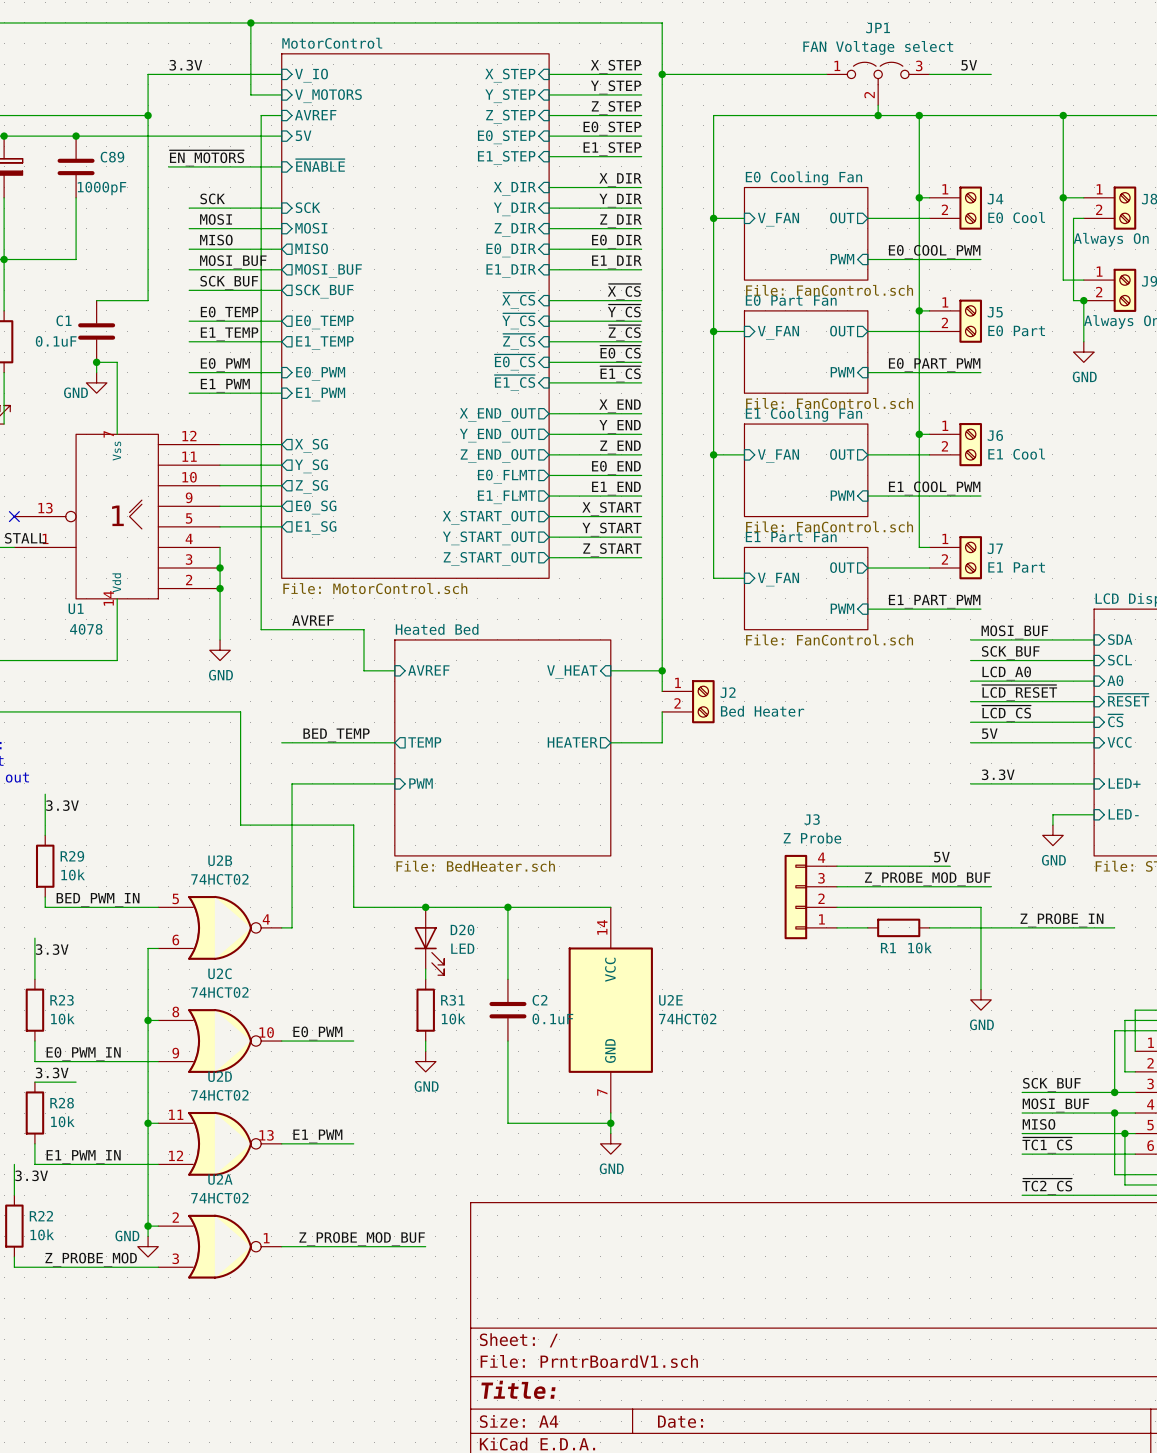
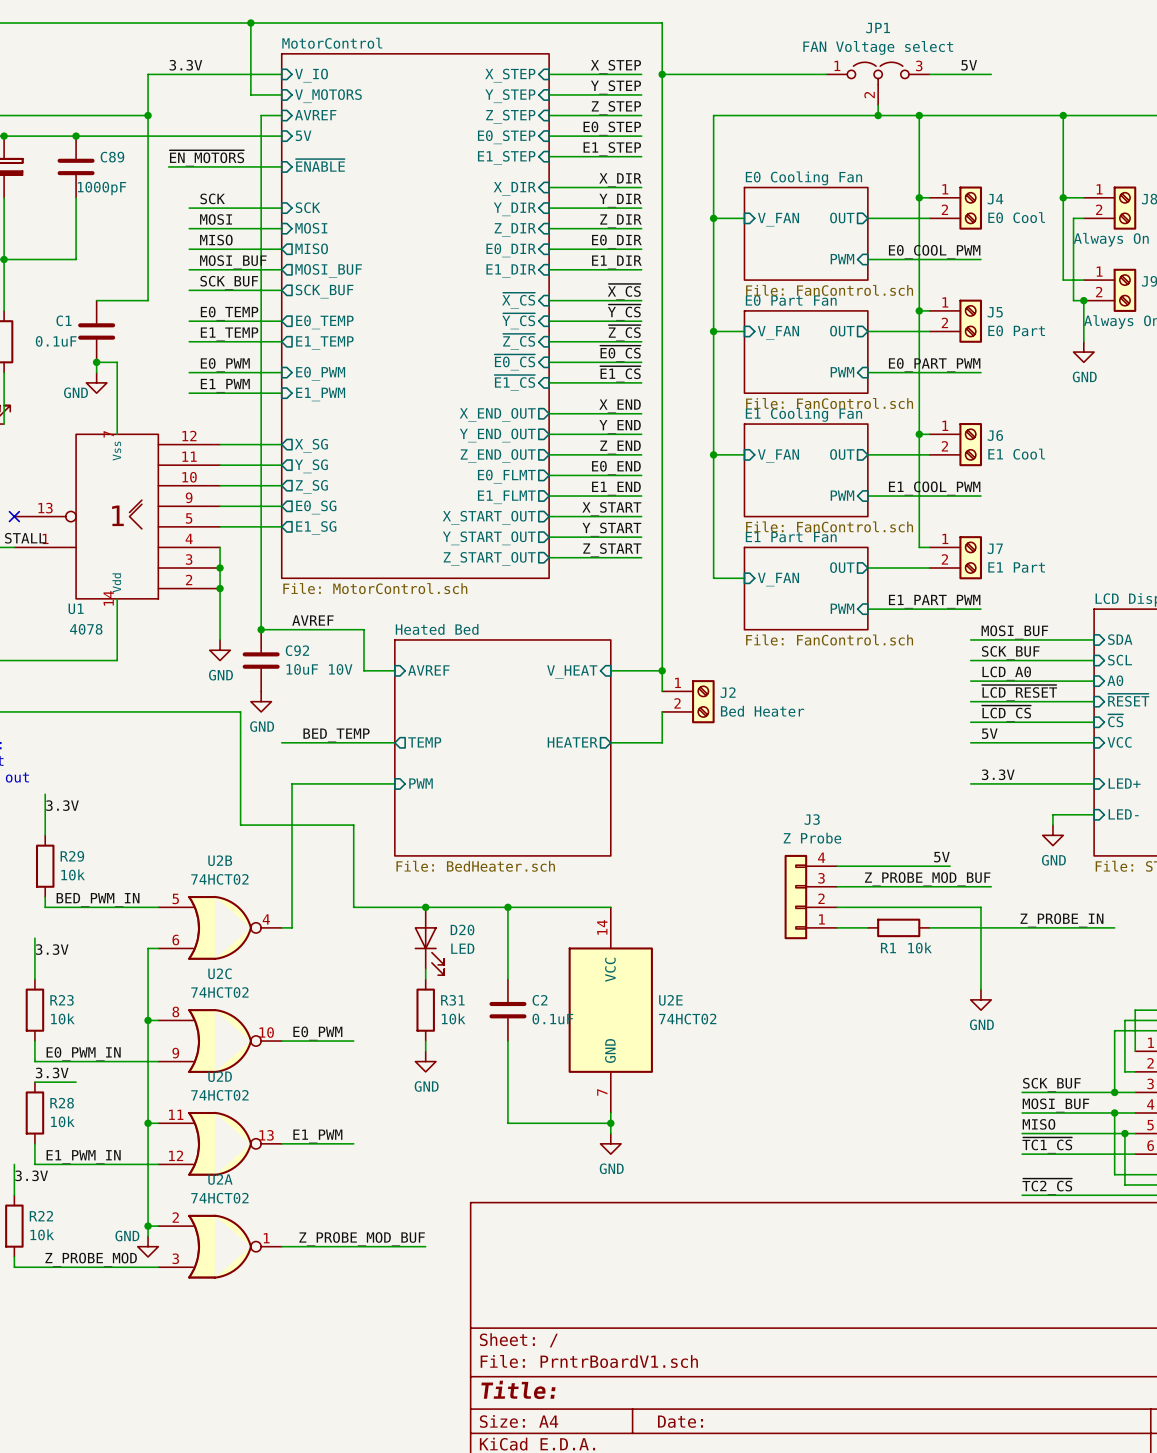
junction: none -> (261, 629)
C92: none -> 10uF 10V (261, 660)
power symbol: none -> GND (261, 701)

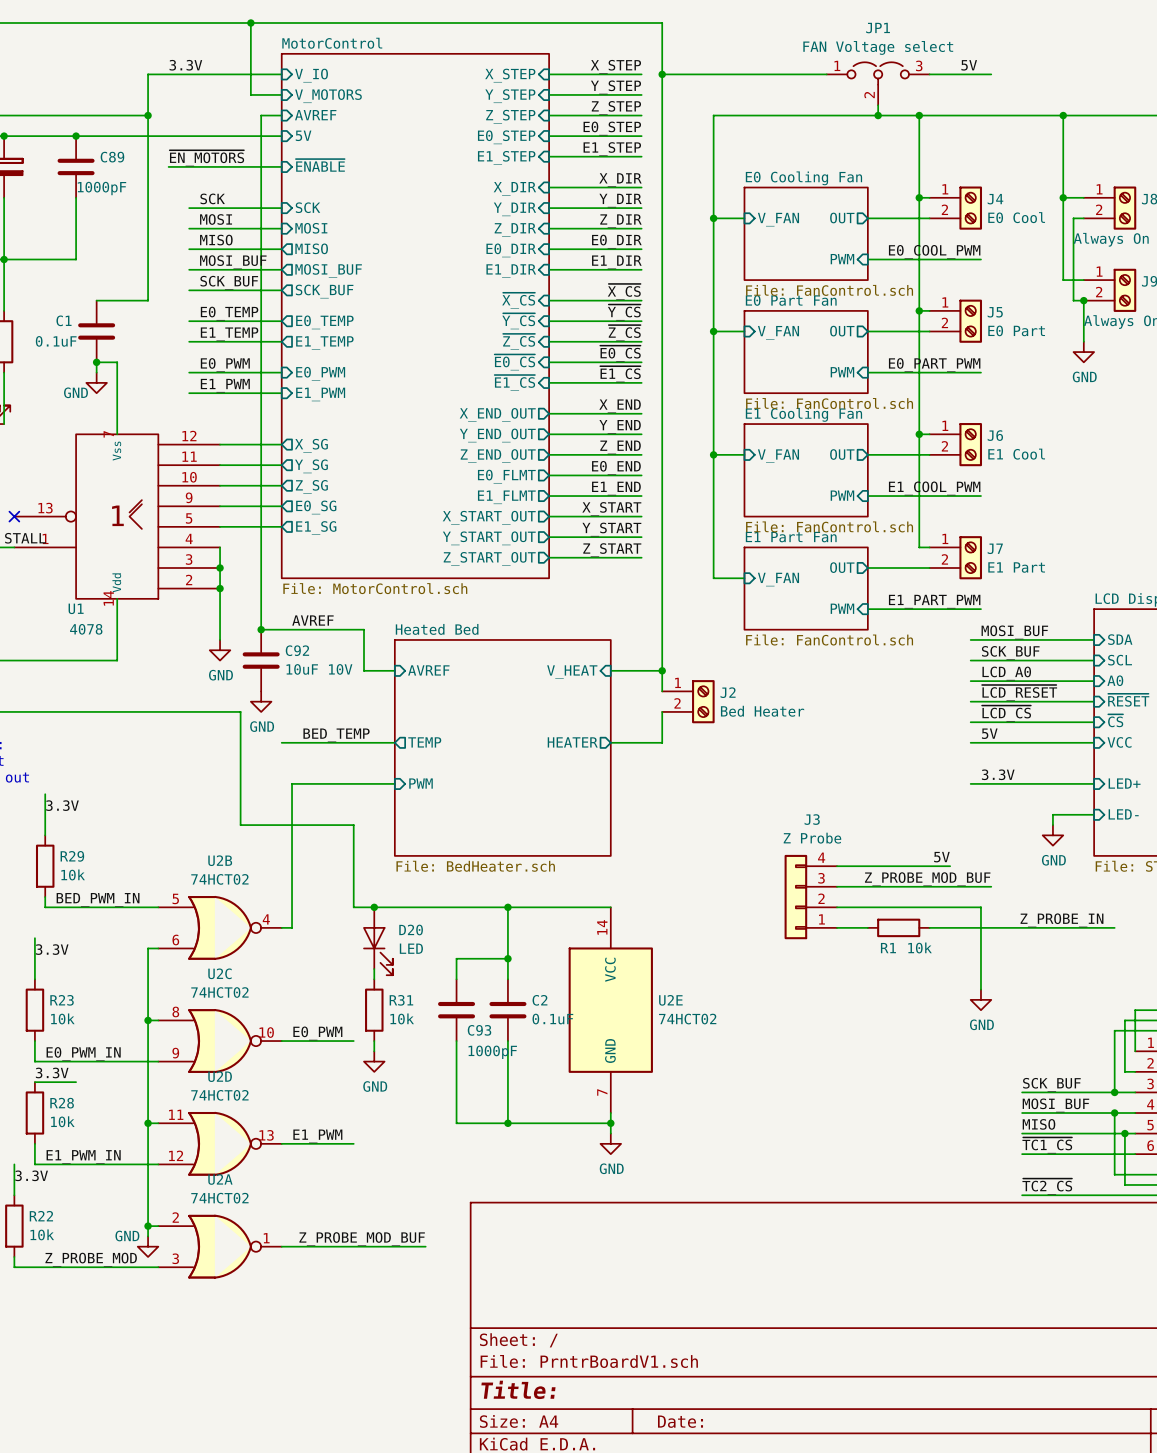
junction: none -> (374, 907)
junction: (425, 907) -> none
D20 position: (429, 941) -> (377, 941)
wire: none -> (507, 958) (456, 958) (456, 979)
junction: none -> (507, 958)
wire: (425, 969) (425, 979) -> (374, 969) (374, 979)
R31 position: (425, 1010) -> (374, 1010)
C93: none -> 1000pF (456, 1010)
wire: (425, 1041) (425, 1051) -> (374, 1041) (374, 1051)
wire: none -> (456, 1041) (456, 1123) (507, 1123)
power symbol position: GND (425, 1061) -> GND (374, 1061)
junction: none -> (507, 1123)

